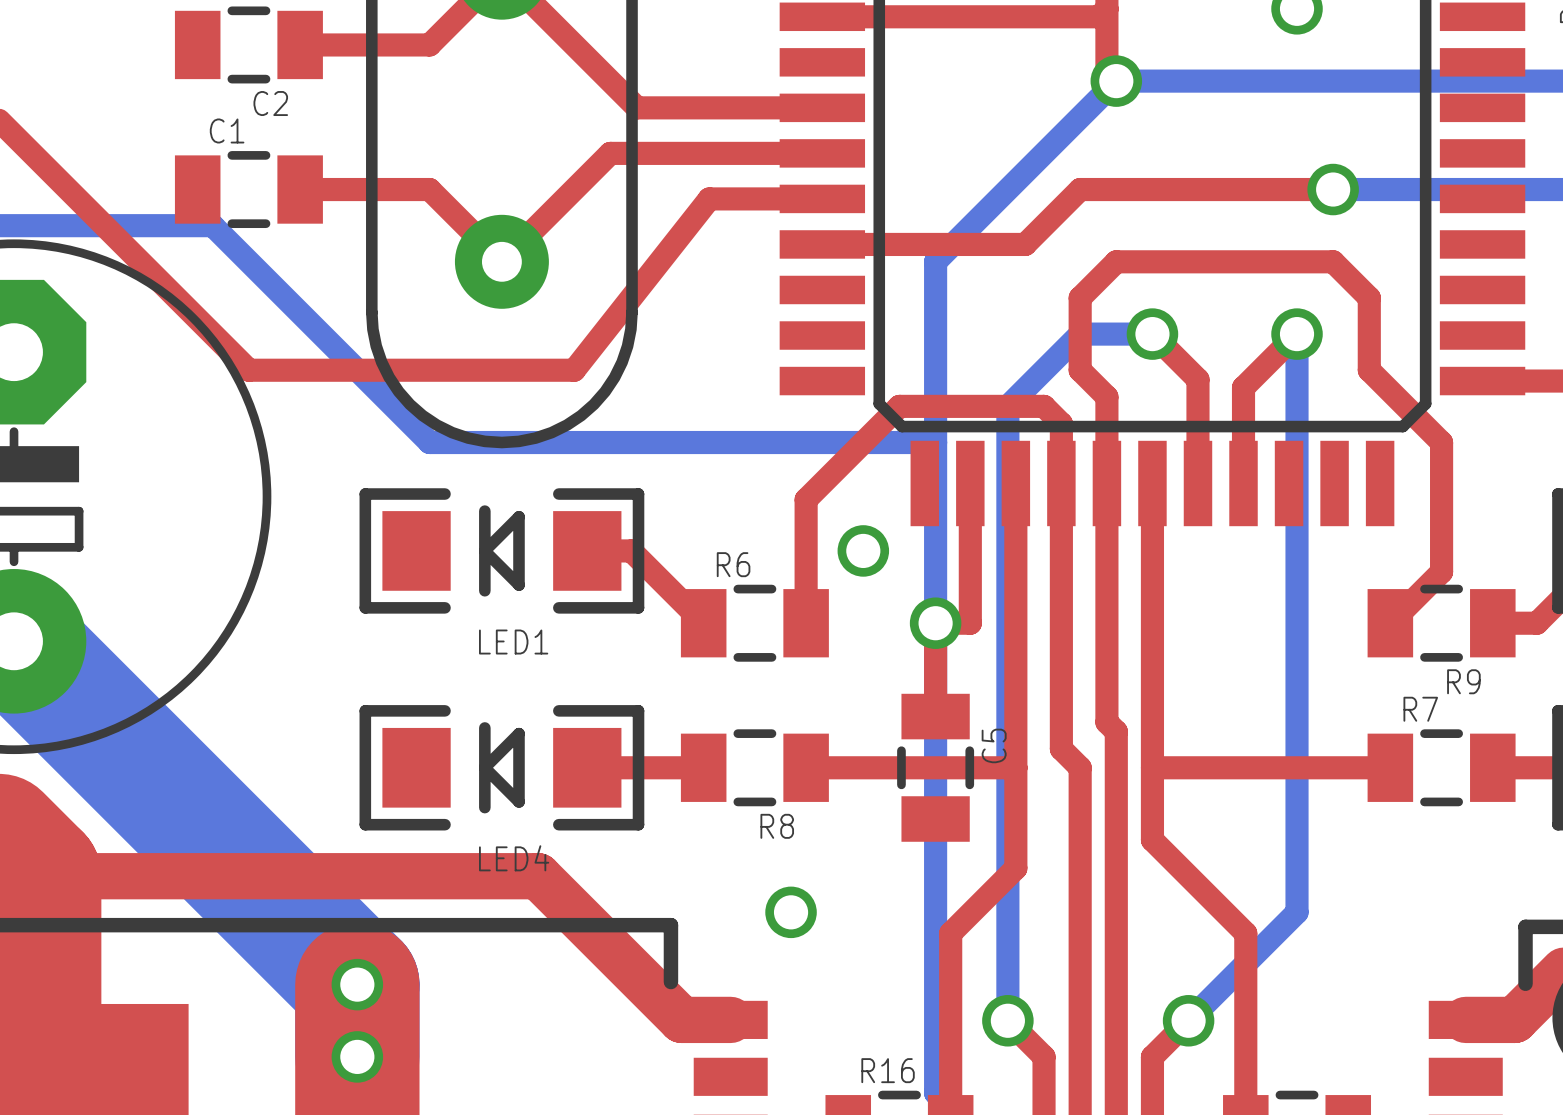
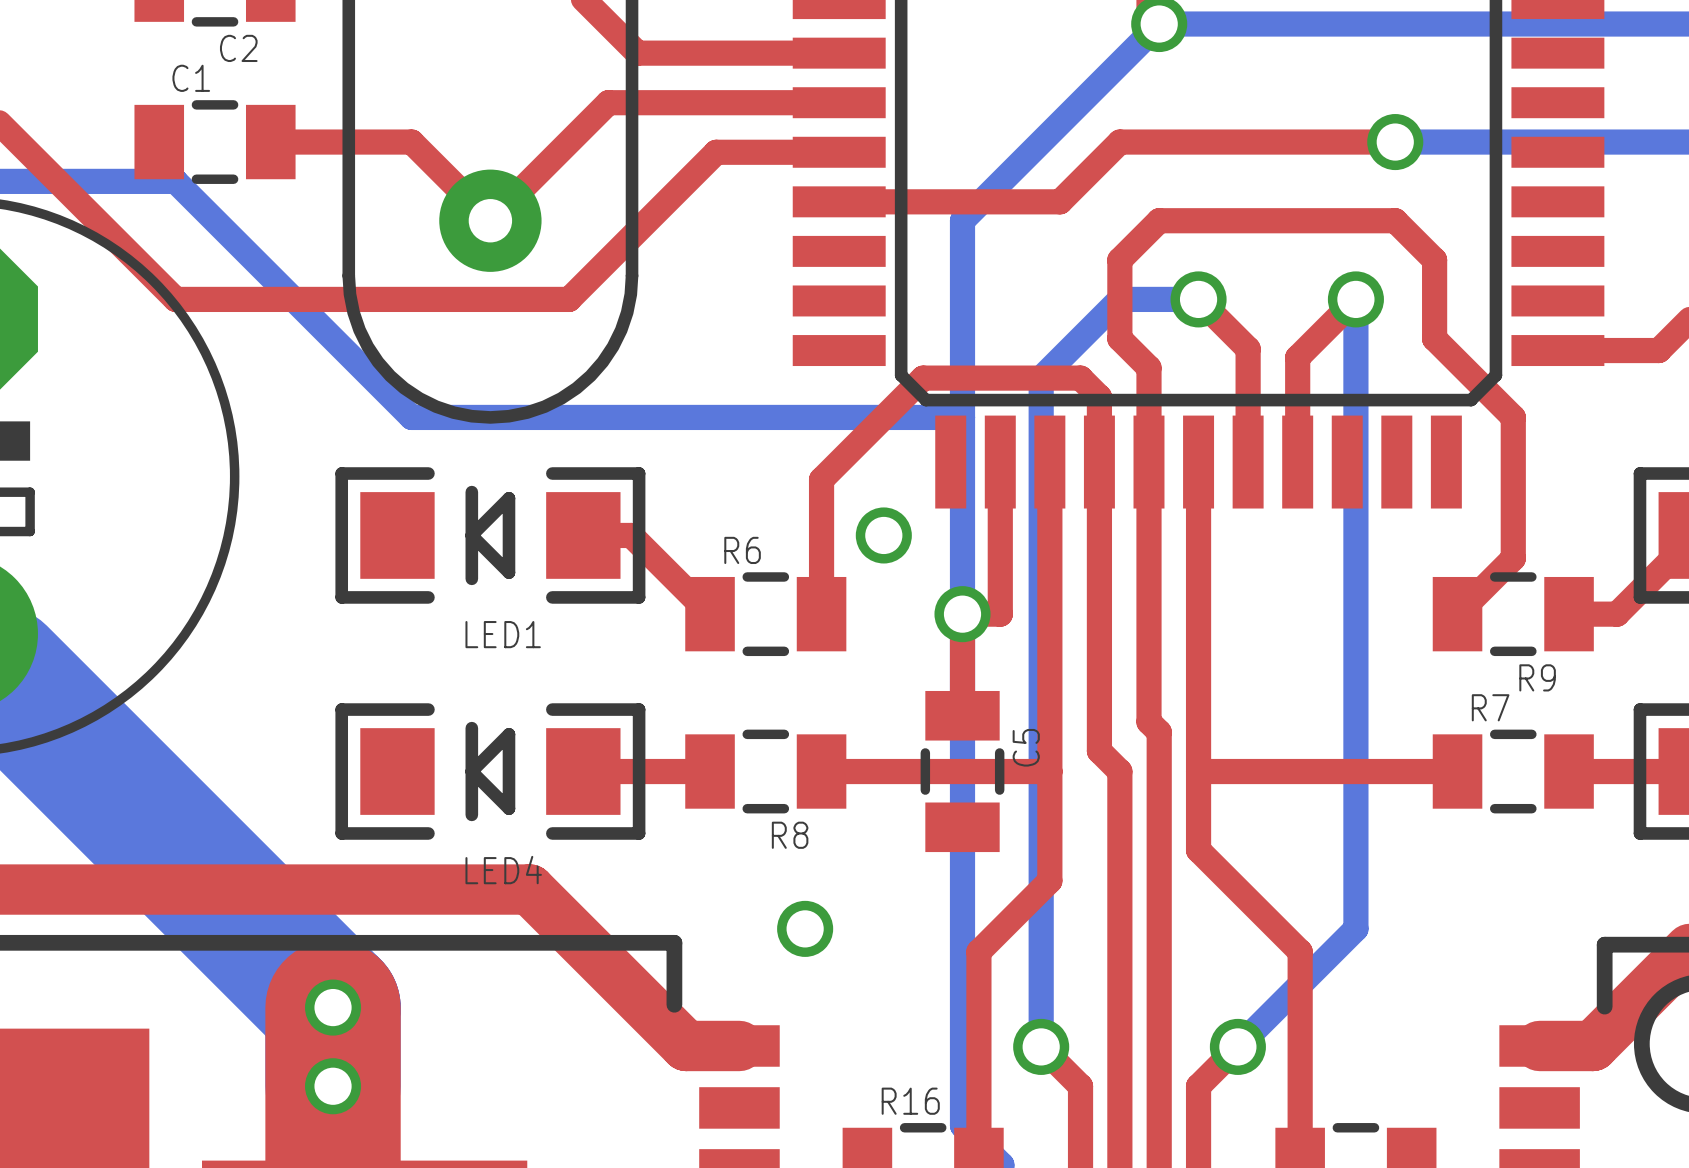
top track: (709, 198) (574, 370) (248, 370) (212, 334) -> (716, 152) (569, 299) (175, 299)

